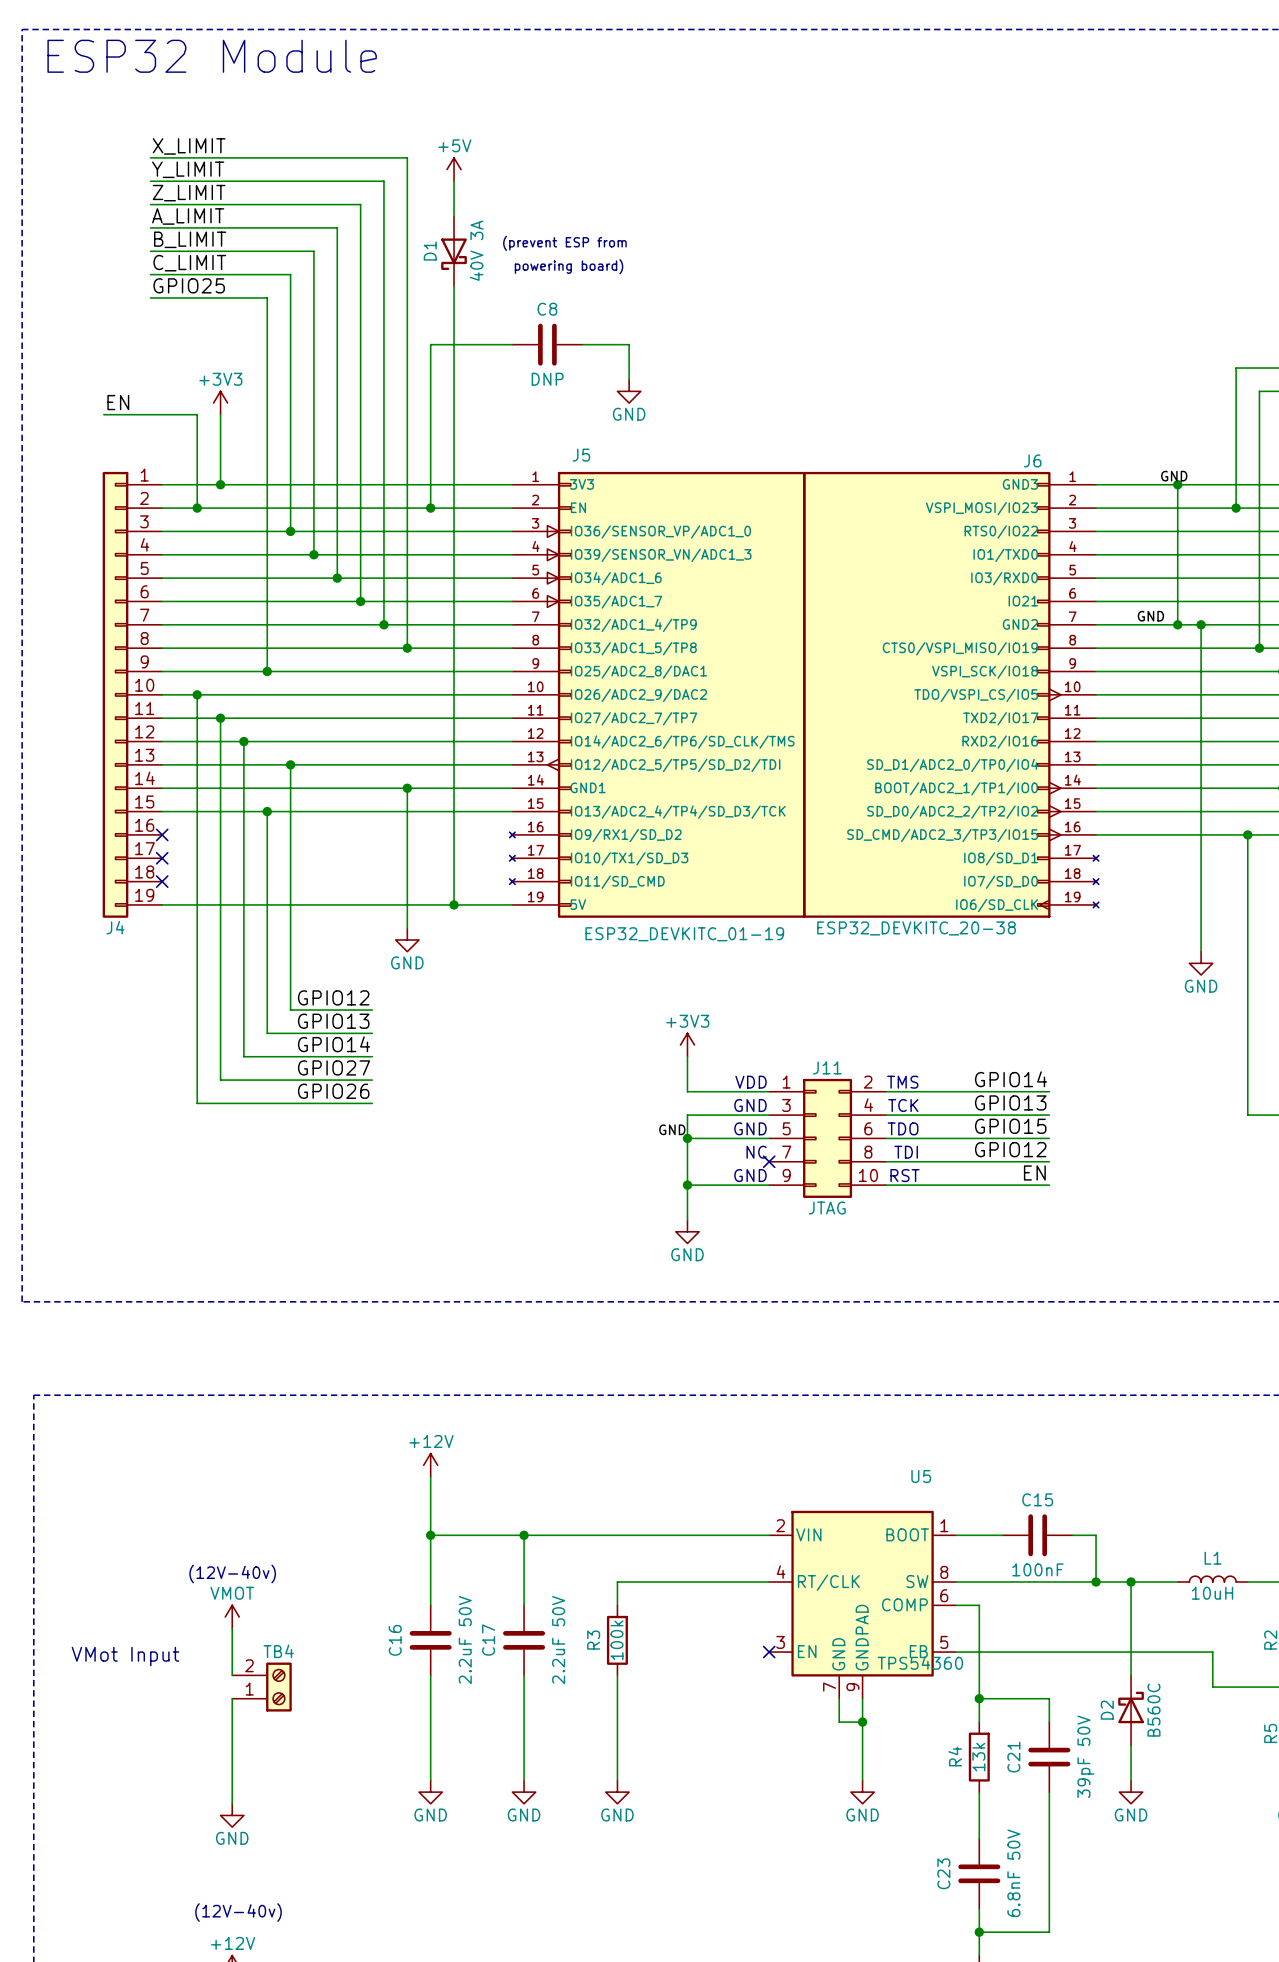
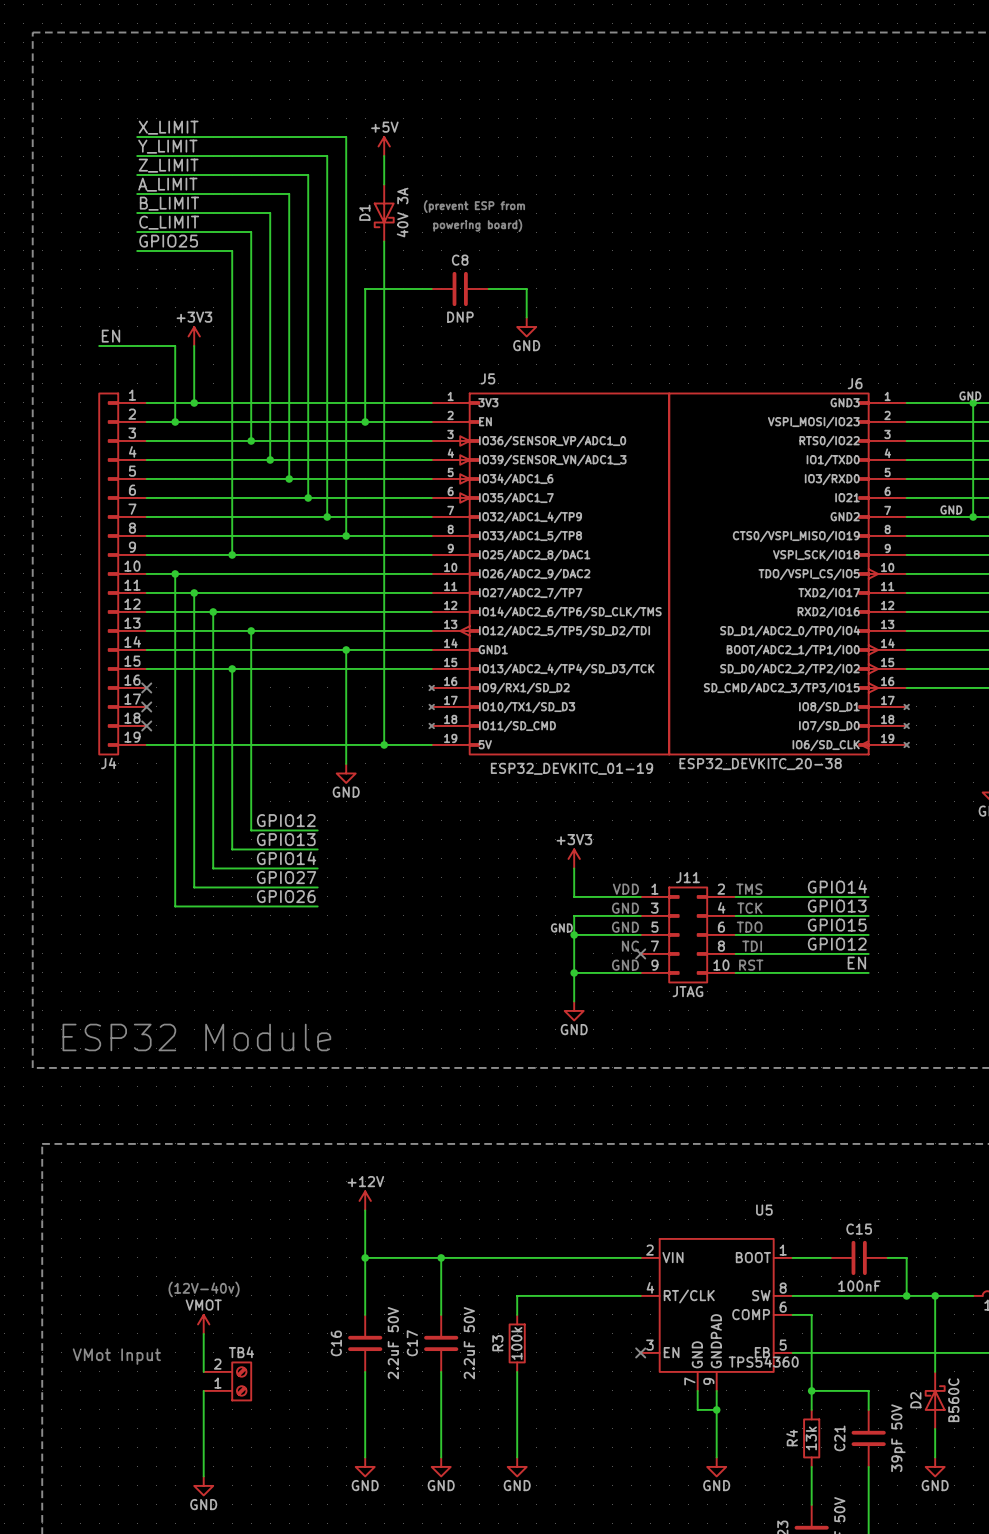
text: ESP32 Module (212, 56) -> none
text: none -> ESP32 Module (196, 1037)

